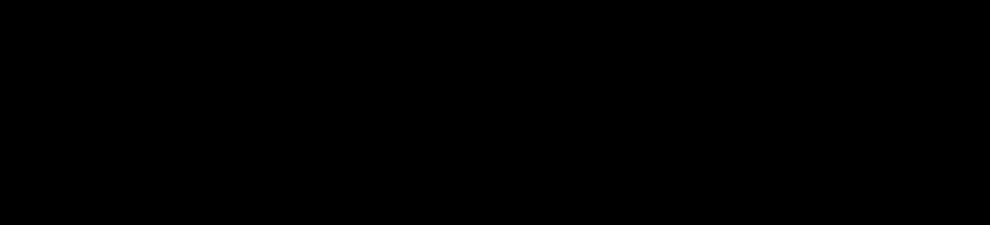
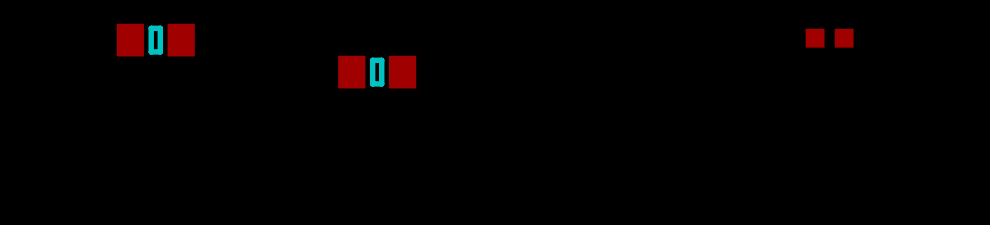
part: none -> (829, 38)
part: none -> (155, 40)
part: none -> (377, 72)

